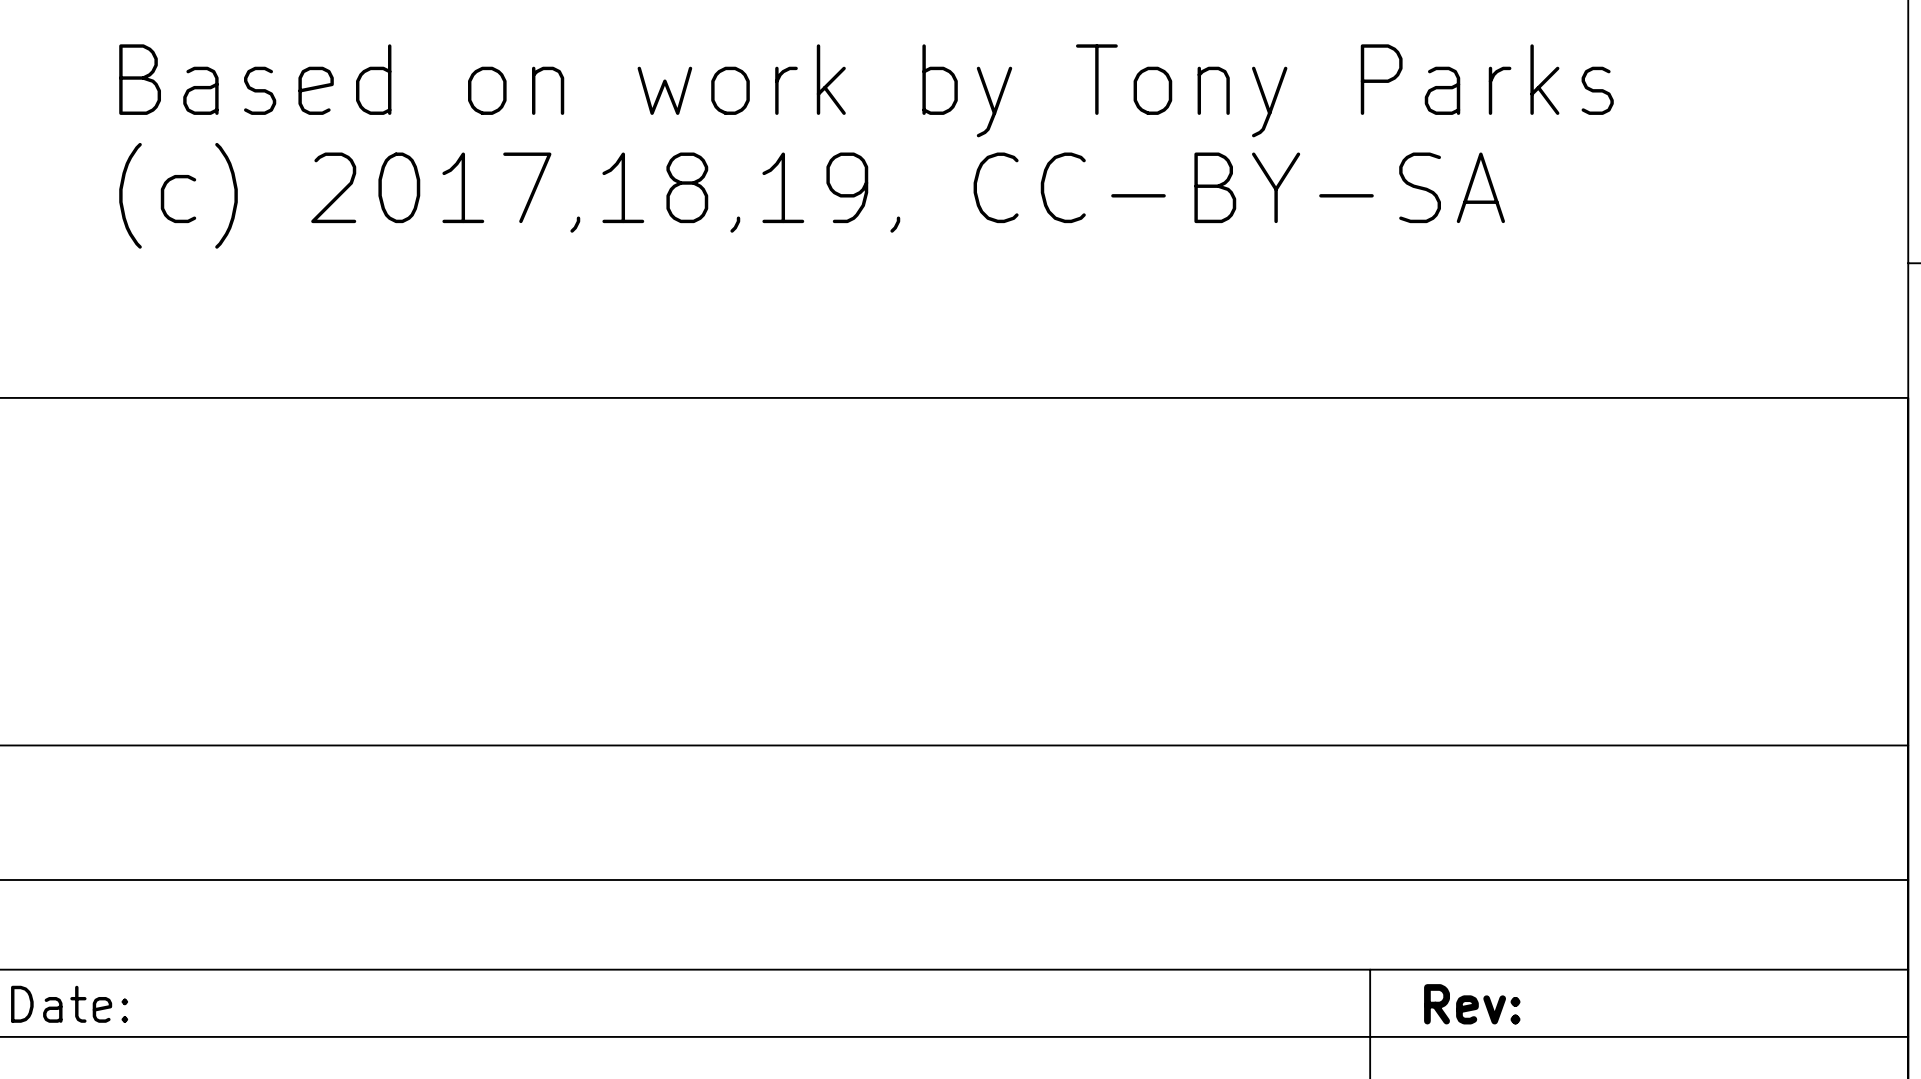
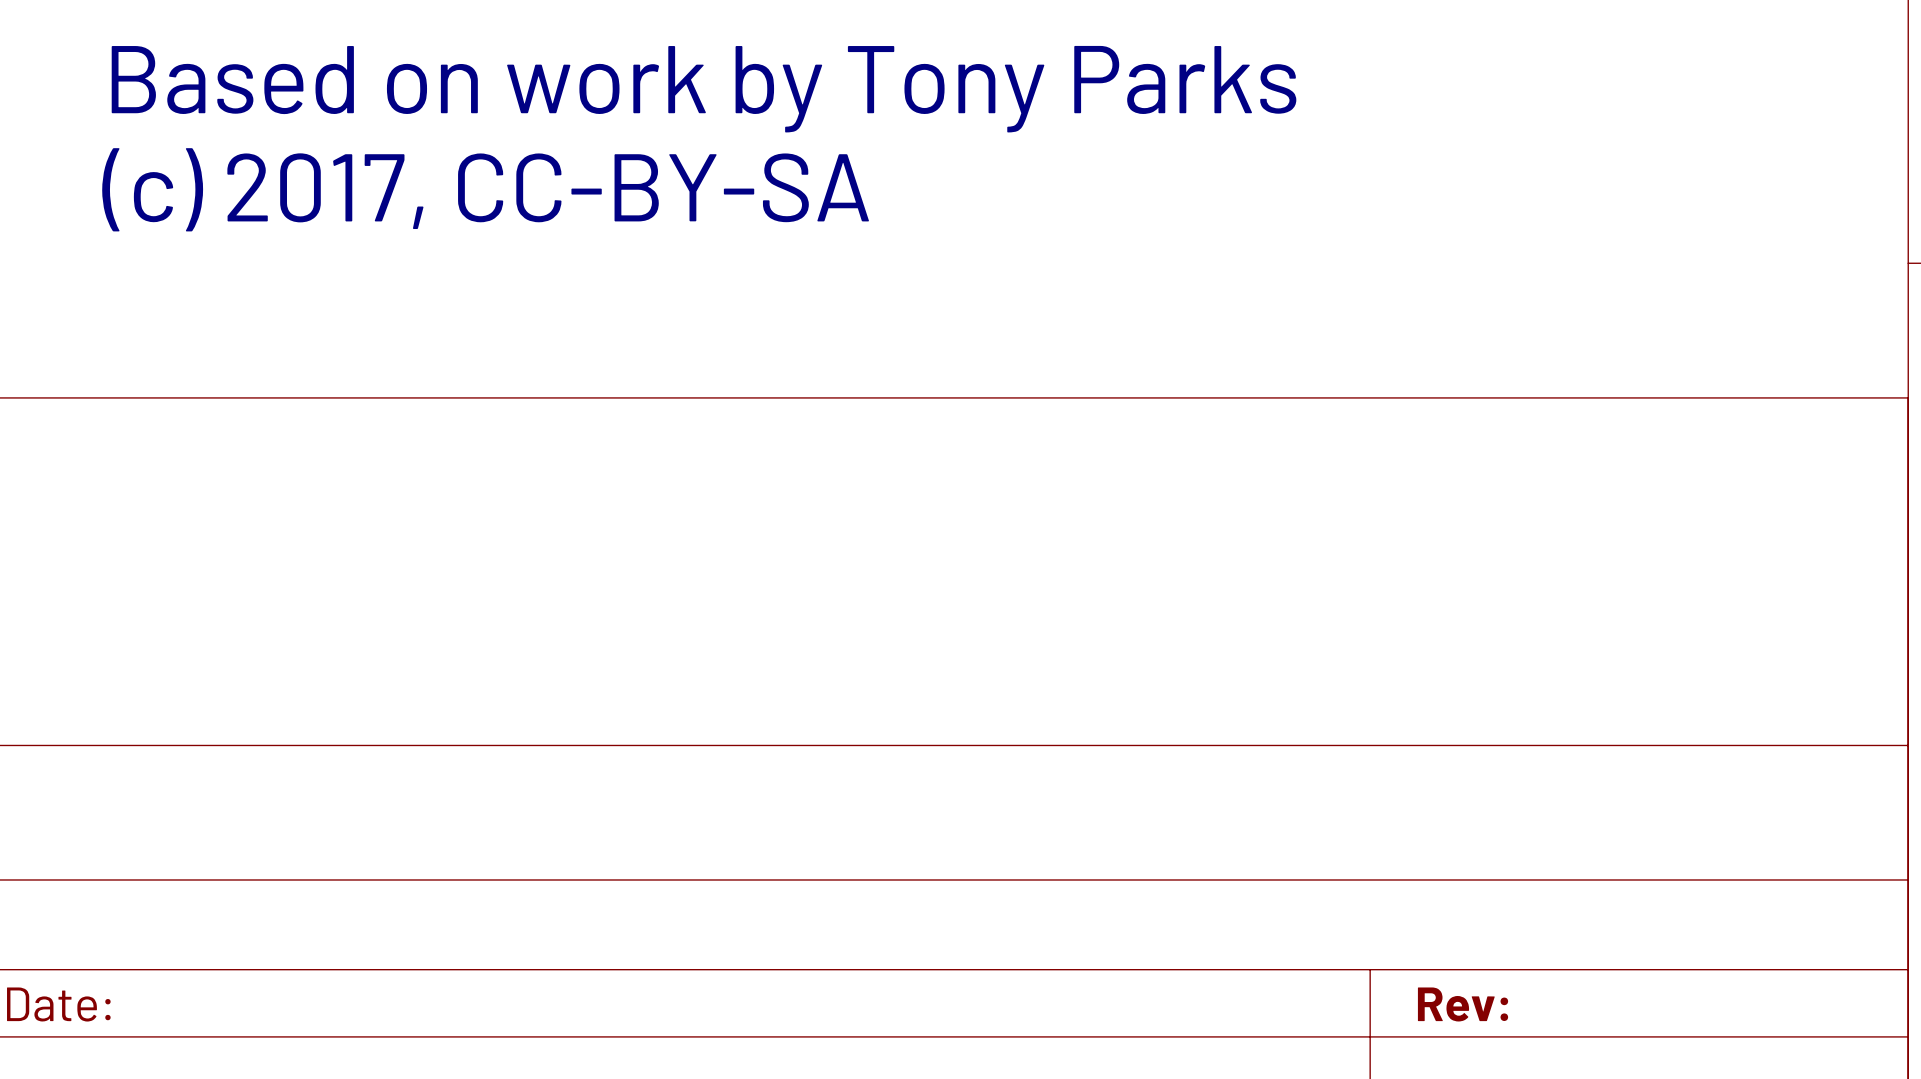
text: (c) 2017,18,19, CC-BY-SA (812, 195) -> (c) 2017, CC-BY-SA (485, 189)

